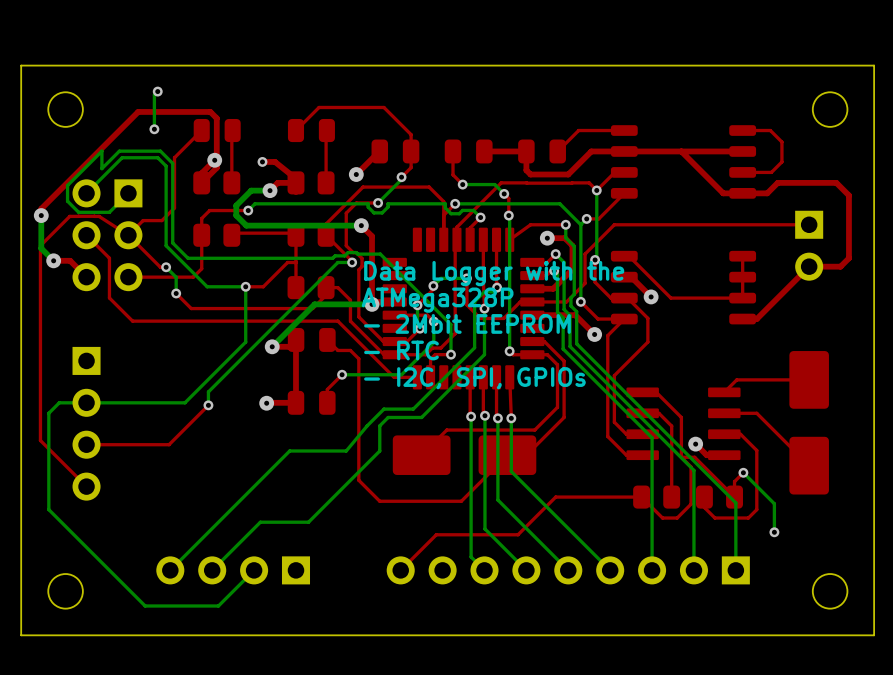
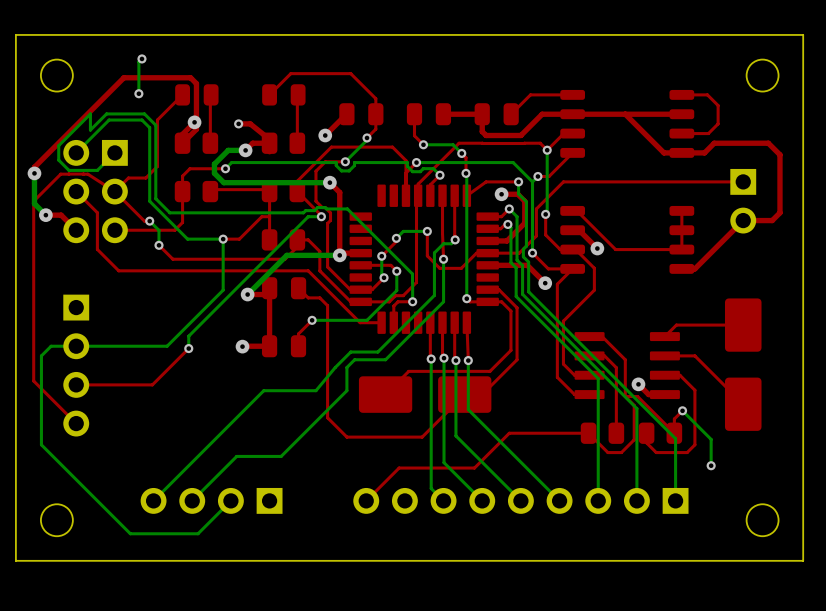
text: Data Logger with the (494, 273) -> none
text: ATMega328P (437, 300) -> none
text: - 2Mbit EEPROM (467, 323) -> none
text: - RTC (401, 350) -> none
text: - I2C, SPI, GPIOs (474, 378) -> none

